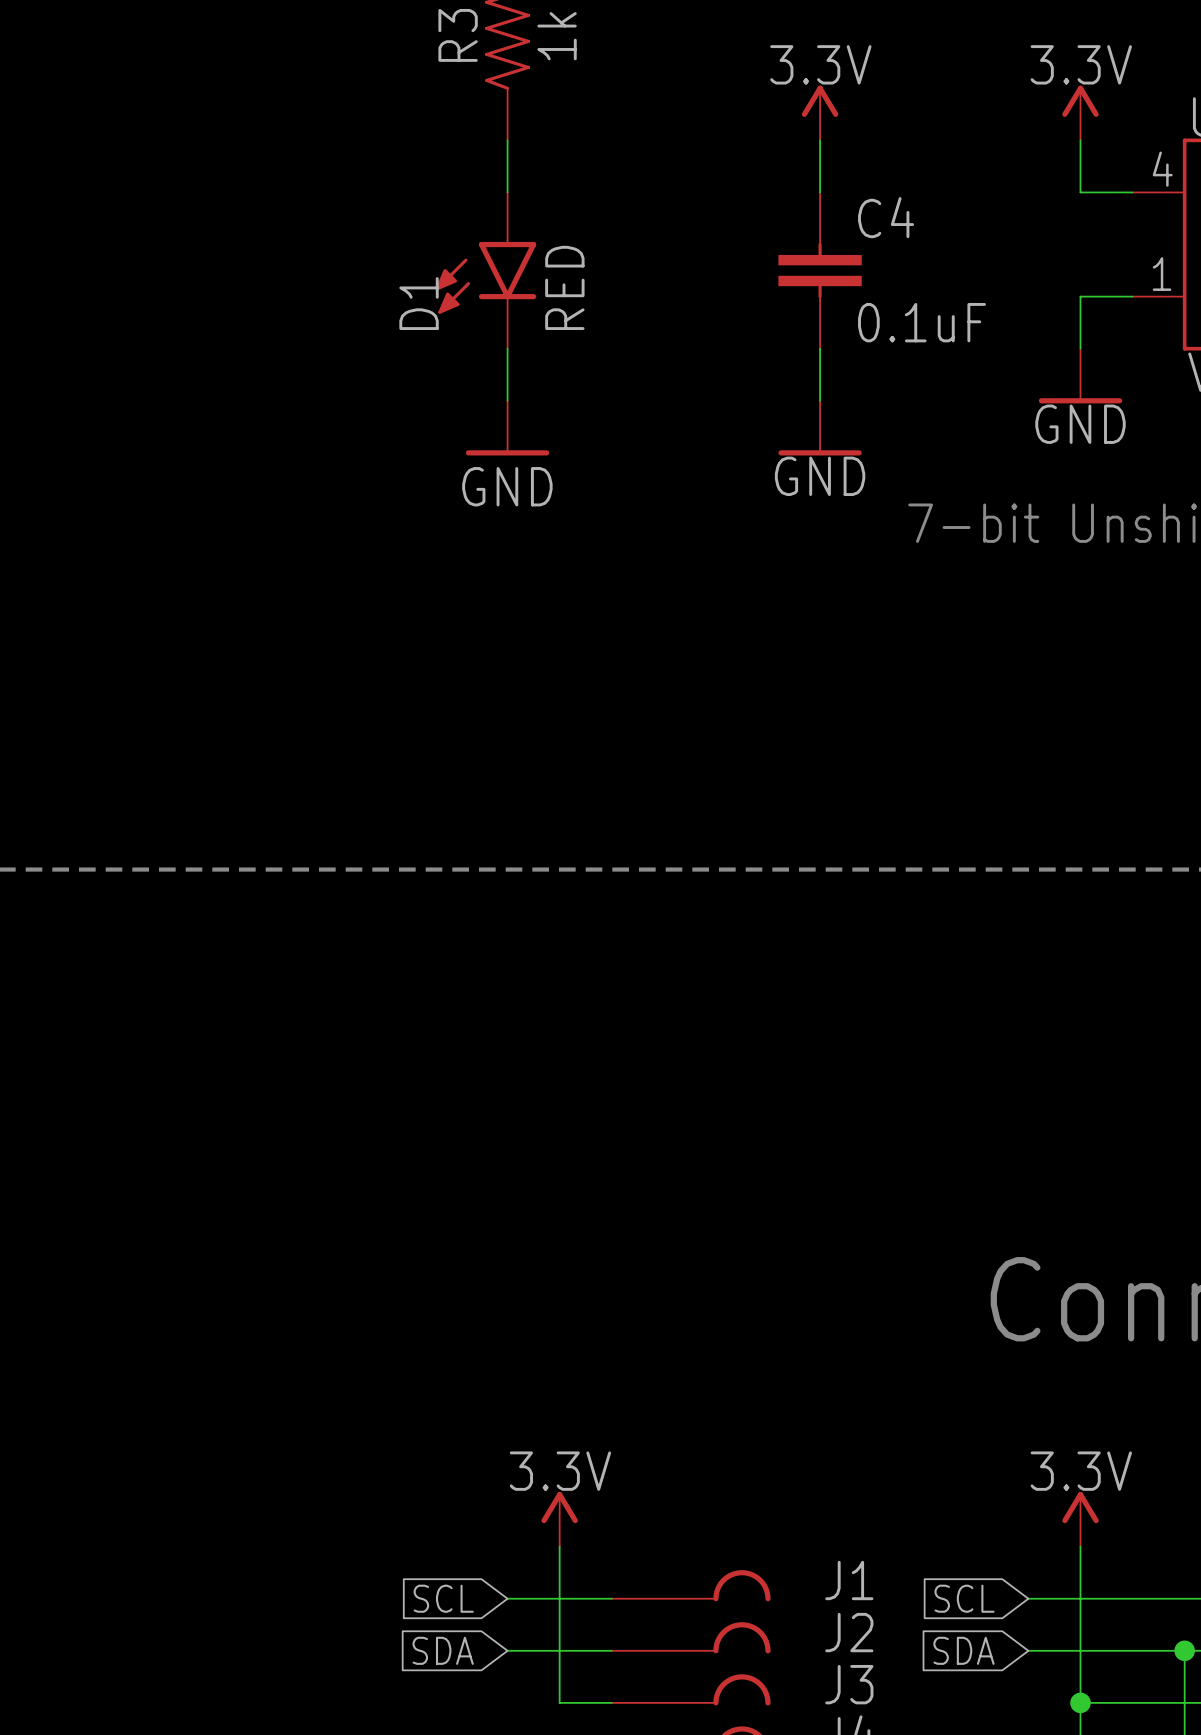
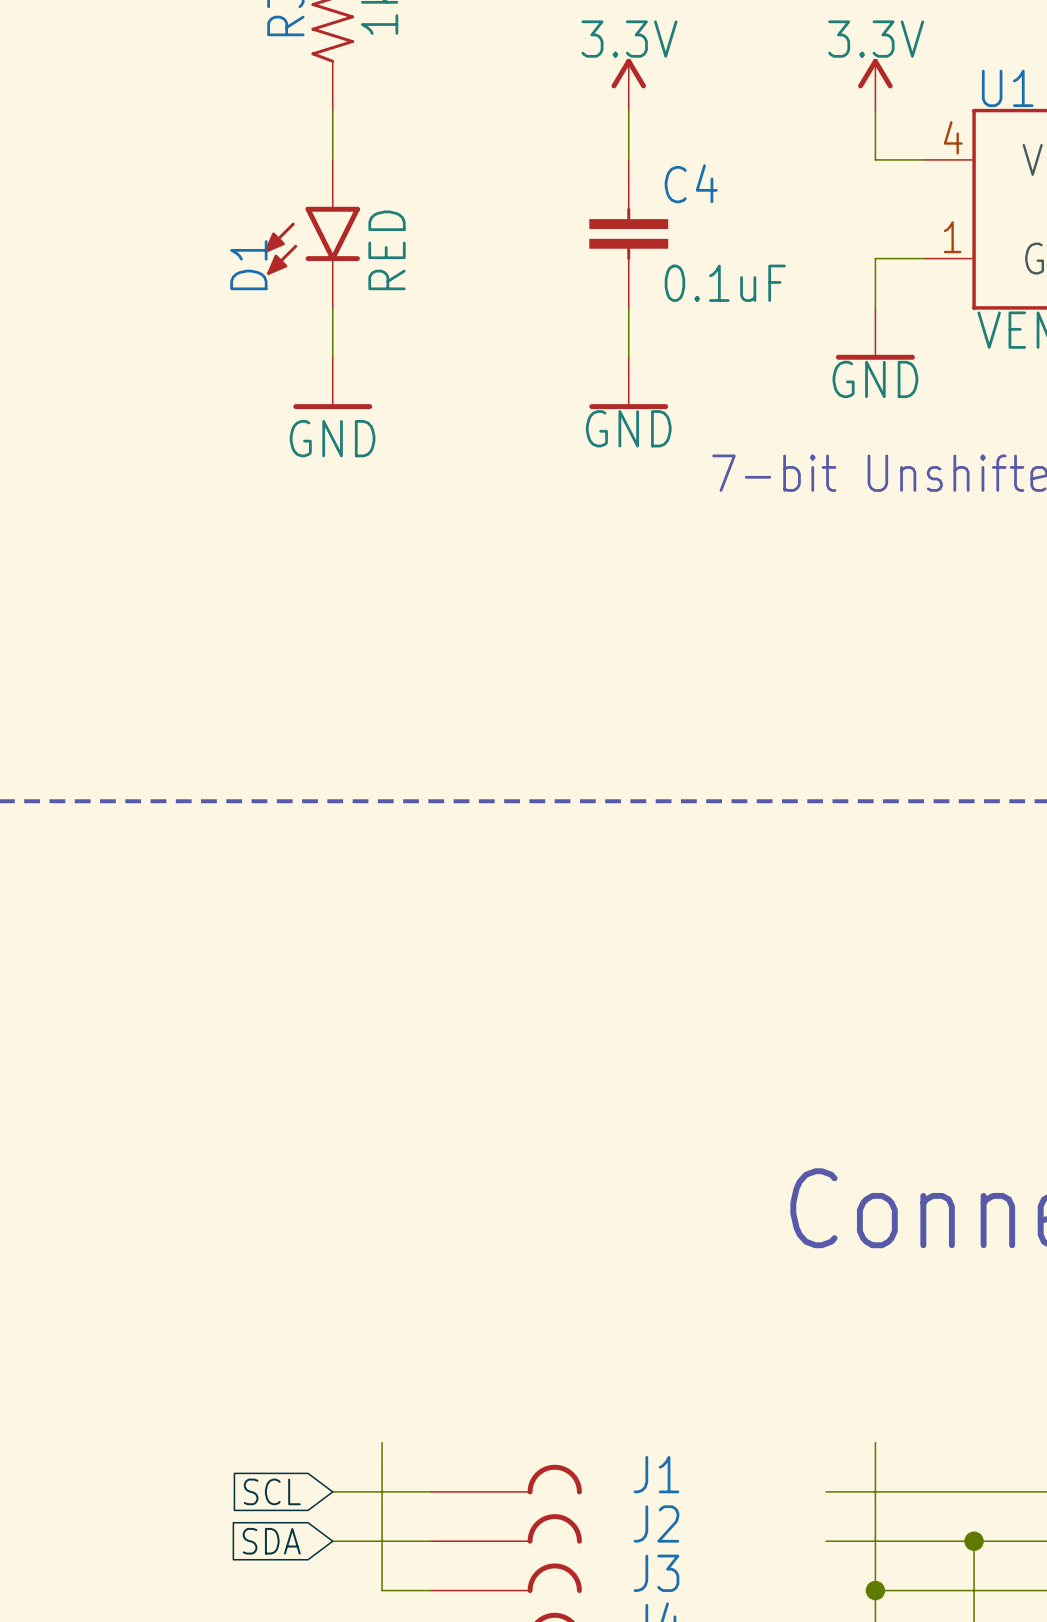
power symbol: 3.3V (559, 1519) -> none
power symbol: 3.3V (1080, 1519) -> none
global label: SCL (964, 1598) -> none
global label: SDA (963, 1650) -> none

